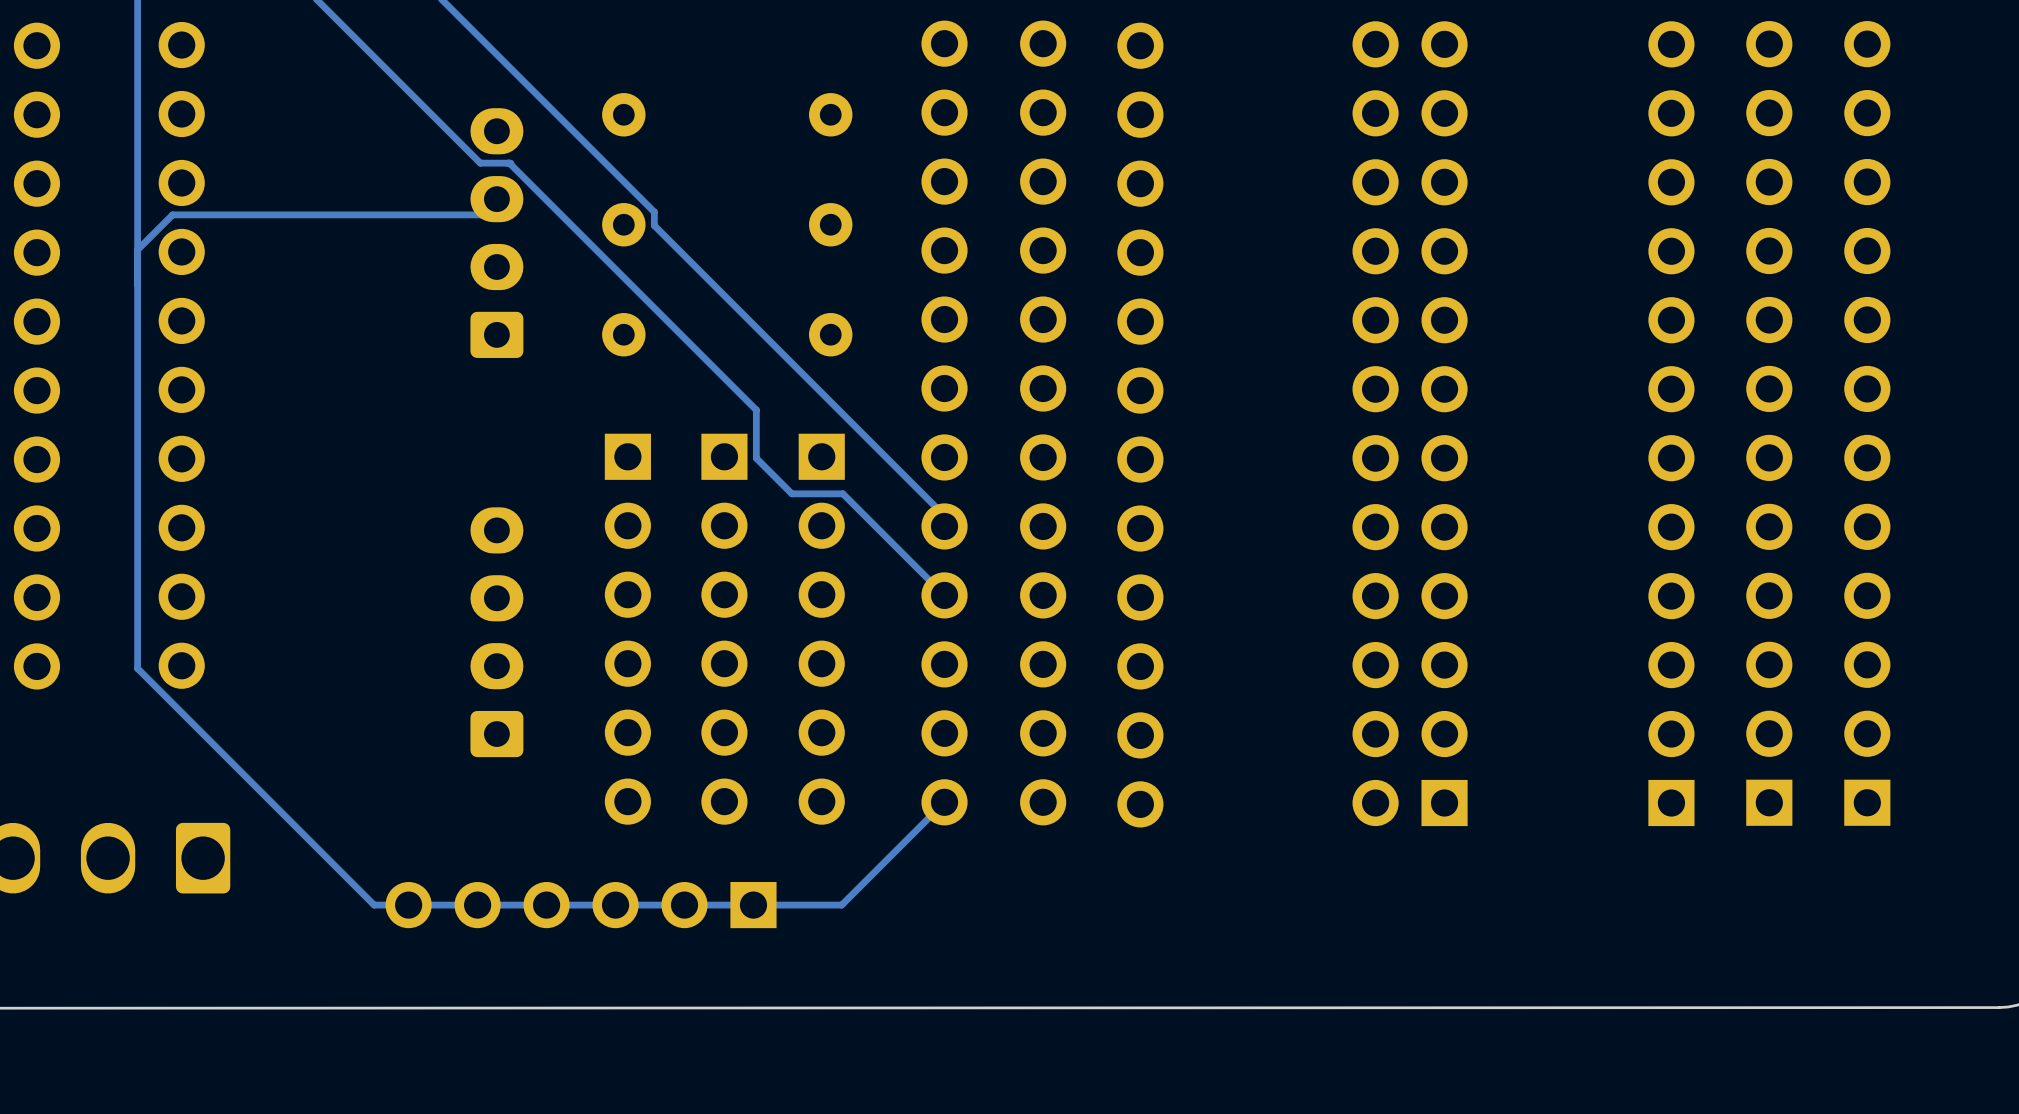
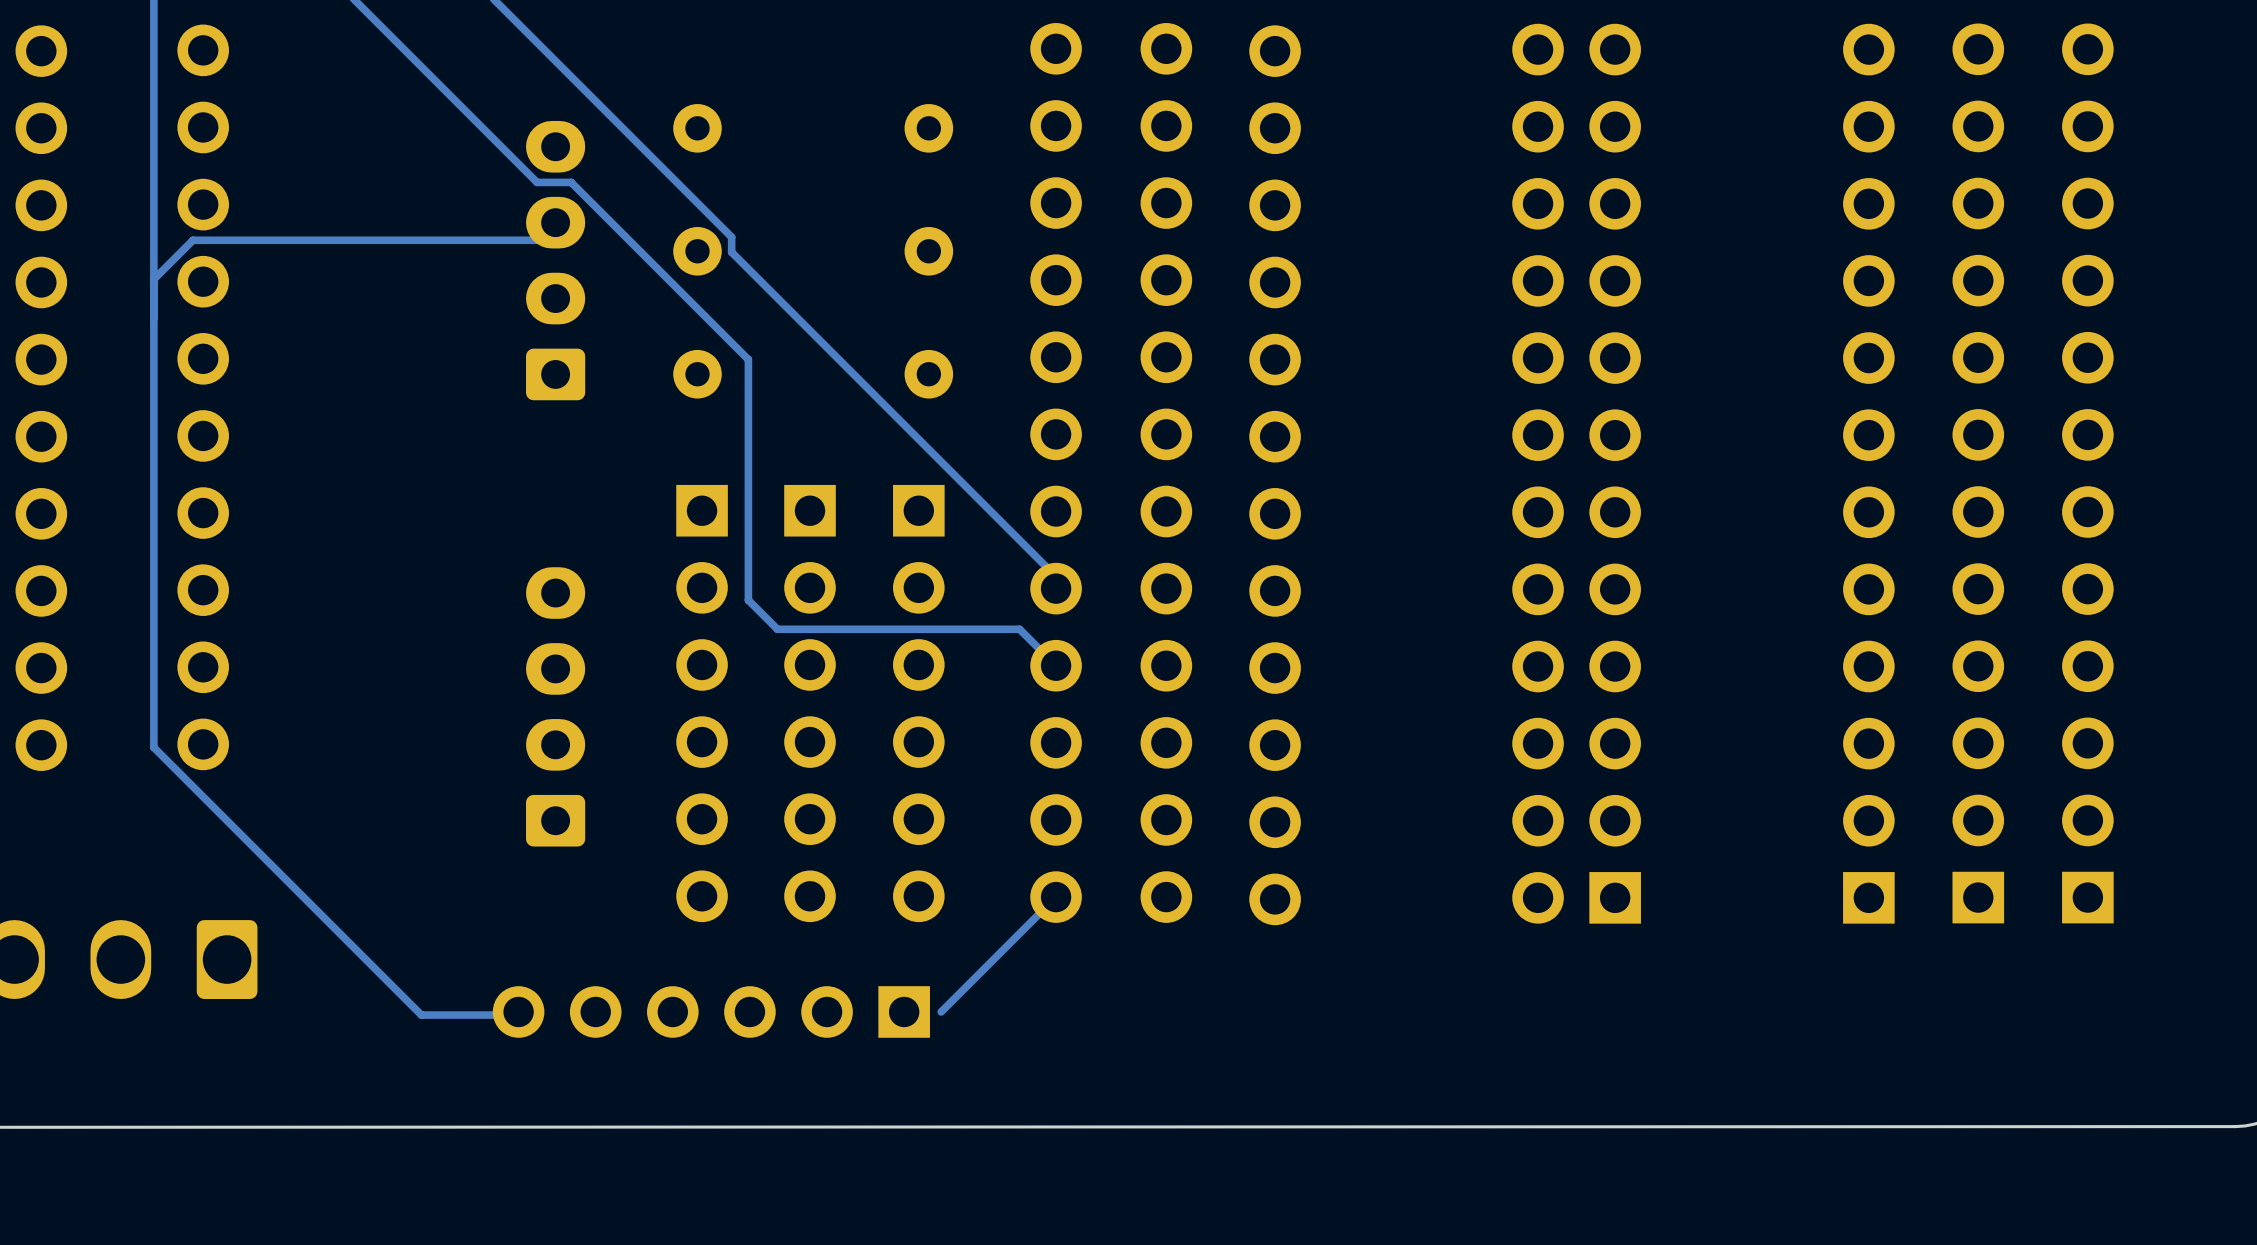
track: (509, 163) (756, 410) (756, 458) (791, 493) (842, 493) (911, 562) -> (571, 182) (748, 359) (748, 600) (777, 629) (1019, 629)
part position: (581, 905) -> (711, 1011)
track: (841, 905) (374, 905) -> (513, 1015) (421, 1015) (418, 1011)

